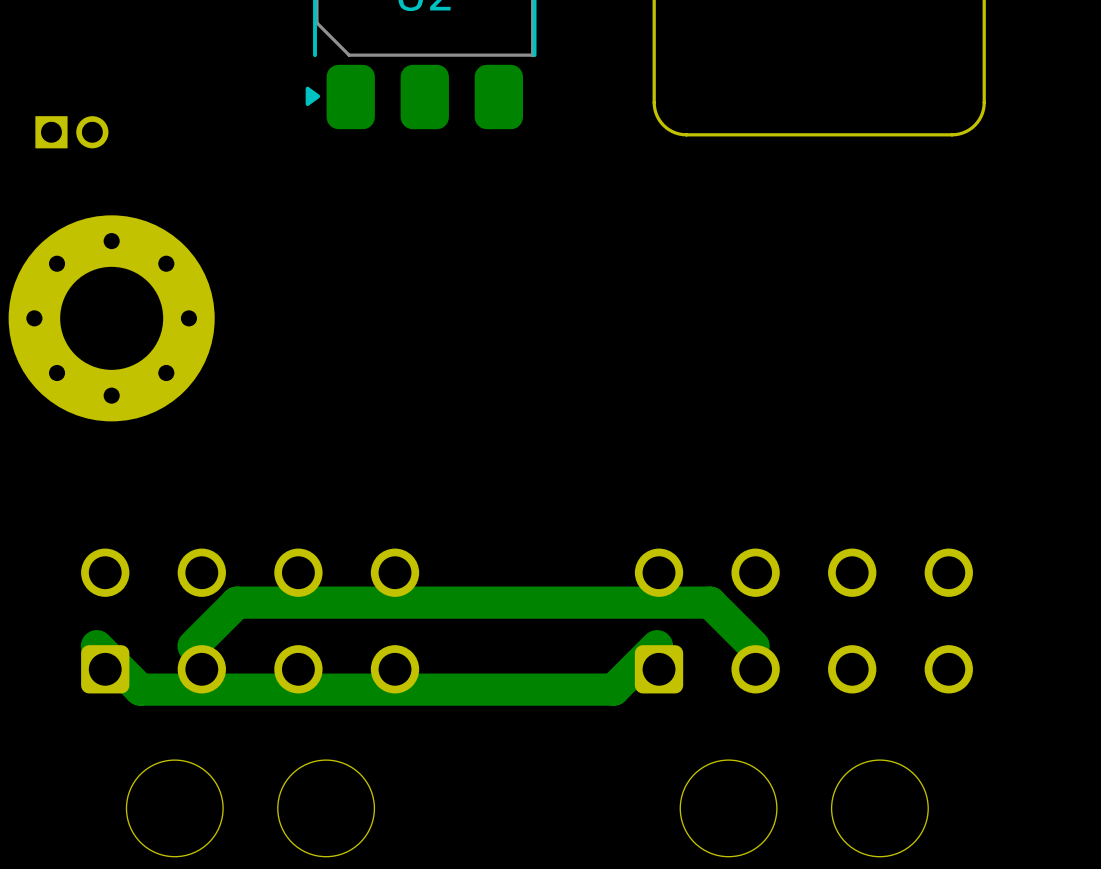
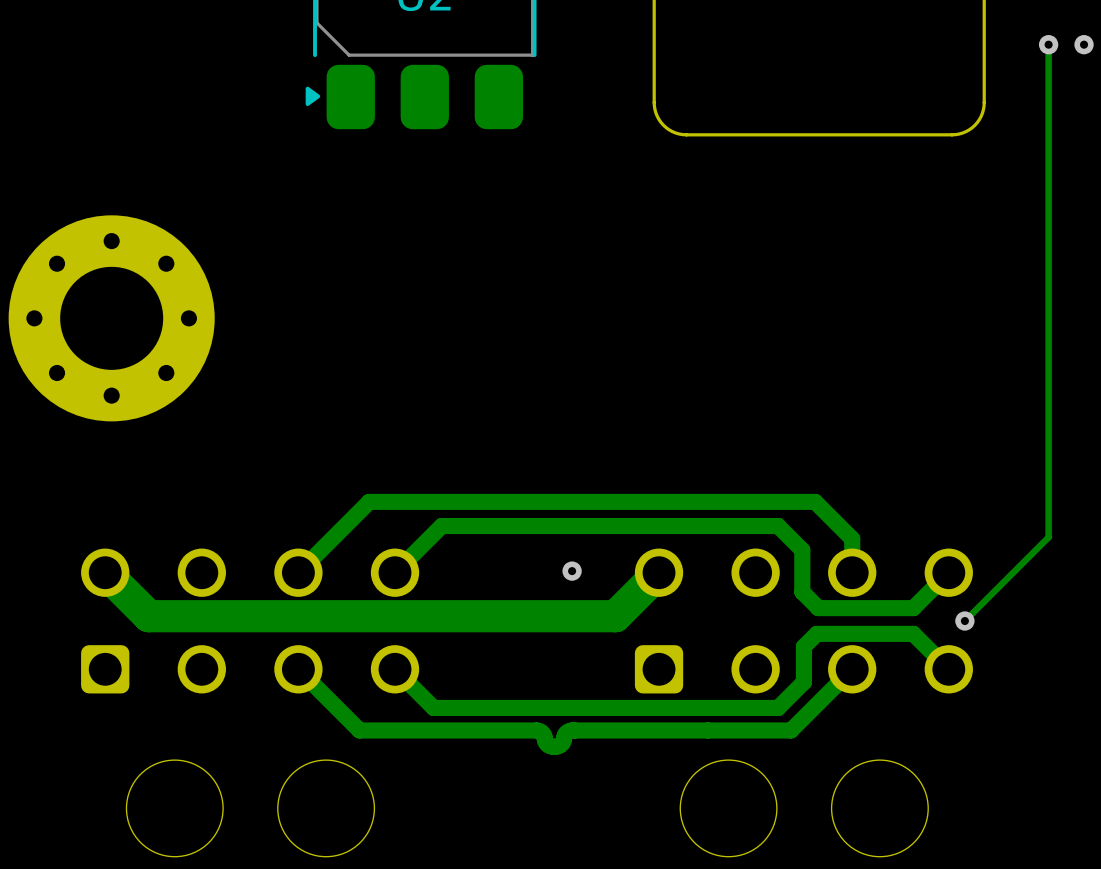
track: none -> (1048, 44) (1048, 537) (964, 621)
via: none -> (1048, 44)
via: none -> (1084, 44)
part: (71, 132) -> none
via: none -> (572, 571)
track: none -> (659, 572) (615, 616) (148, 616) (105, 572)
track: none -> (852, 572) (852, 538) (815, 501) (369, 501) (298, 572)
track: none -> (948, 572) (913, 608) (818, 608) (802, 592) (802, 550) (778, 526) (441, 526) (395, 572)
via: none -> (964, 621)
track: (657, 646) (613, 689) (140, 689) (96, 646) -> none
track: (753, 646) (710, 602) (236, 602) (193, 646) -> none
track: none -> (852, 669) (791, 730) (571, 730) (565, 734) (561, 744) (555, 746) (547, 744) (542, 733) (537, 730) (359, 730) (298, 669)
track: none -> (948, 669) (913, 633) (816, 633) (803, 646) (803, 682) (778, 707) (433, 707) (395, 669)

